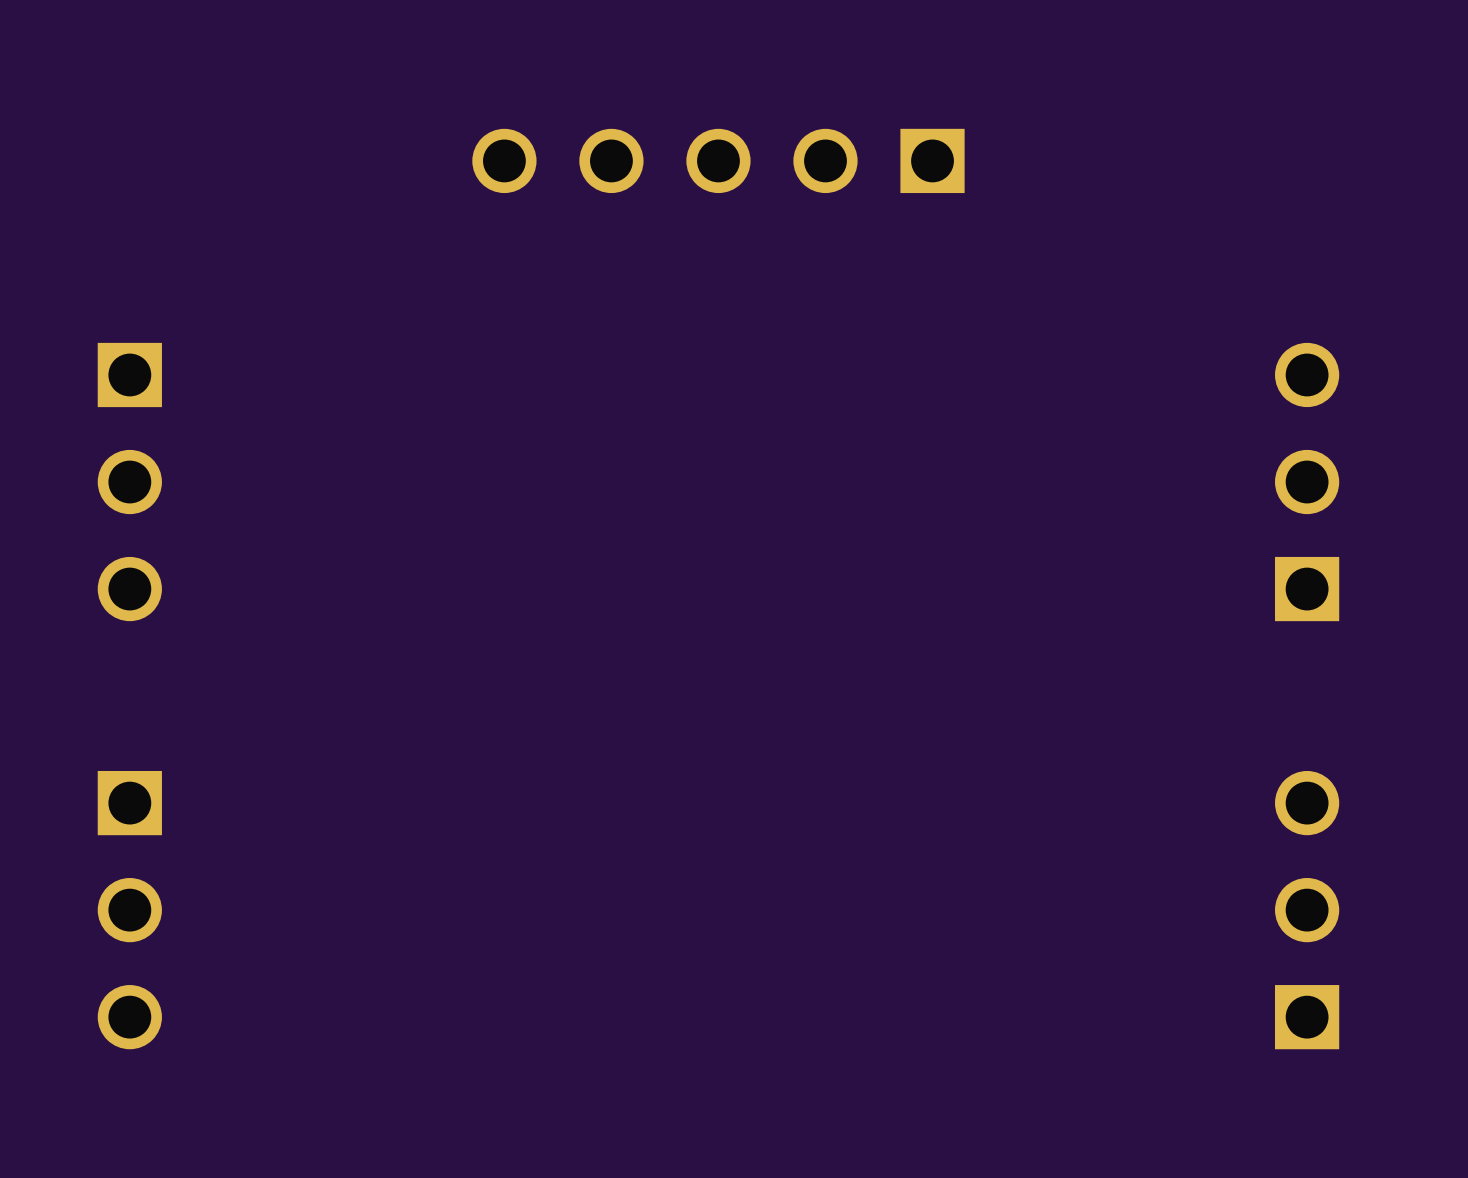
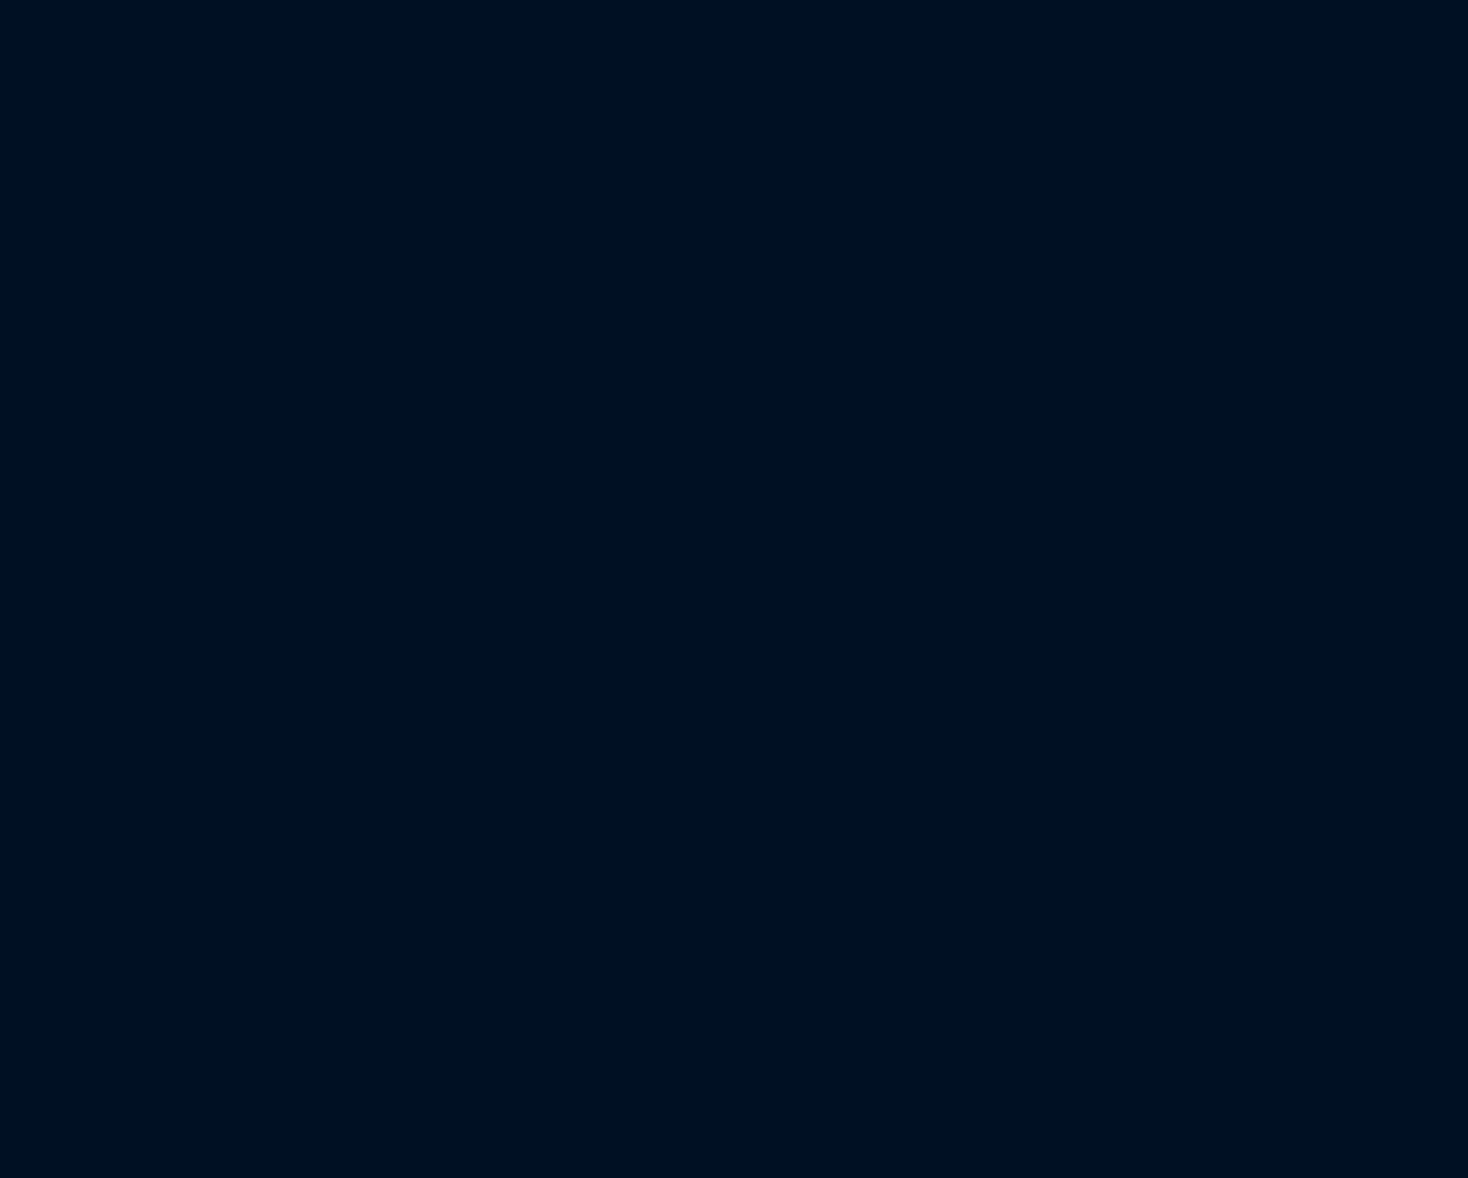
part: (718, 160) -> none
part: (129, 482) -> none
part: (1307, 482) -> none
part: (129, 910) -> none
part: (1307, 910) -> none

